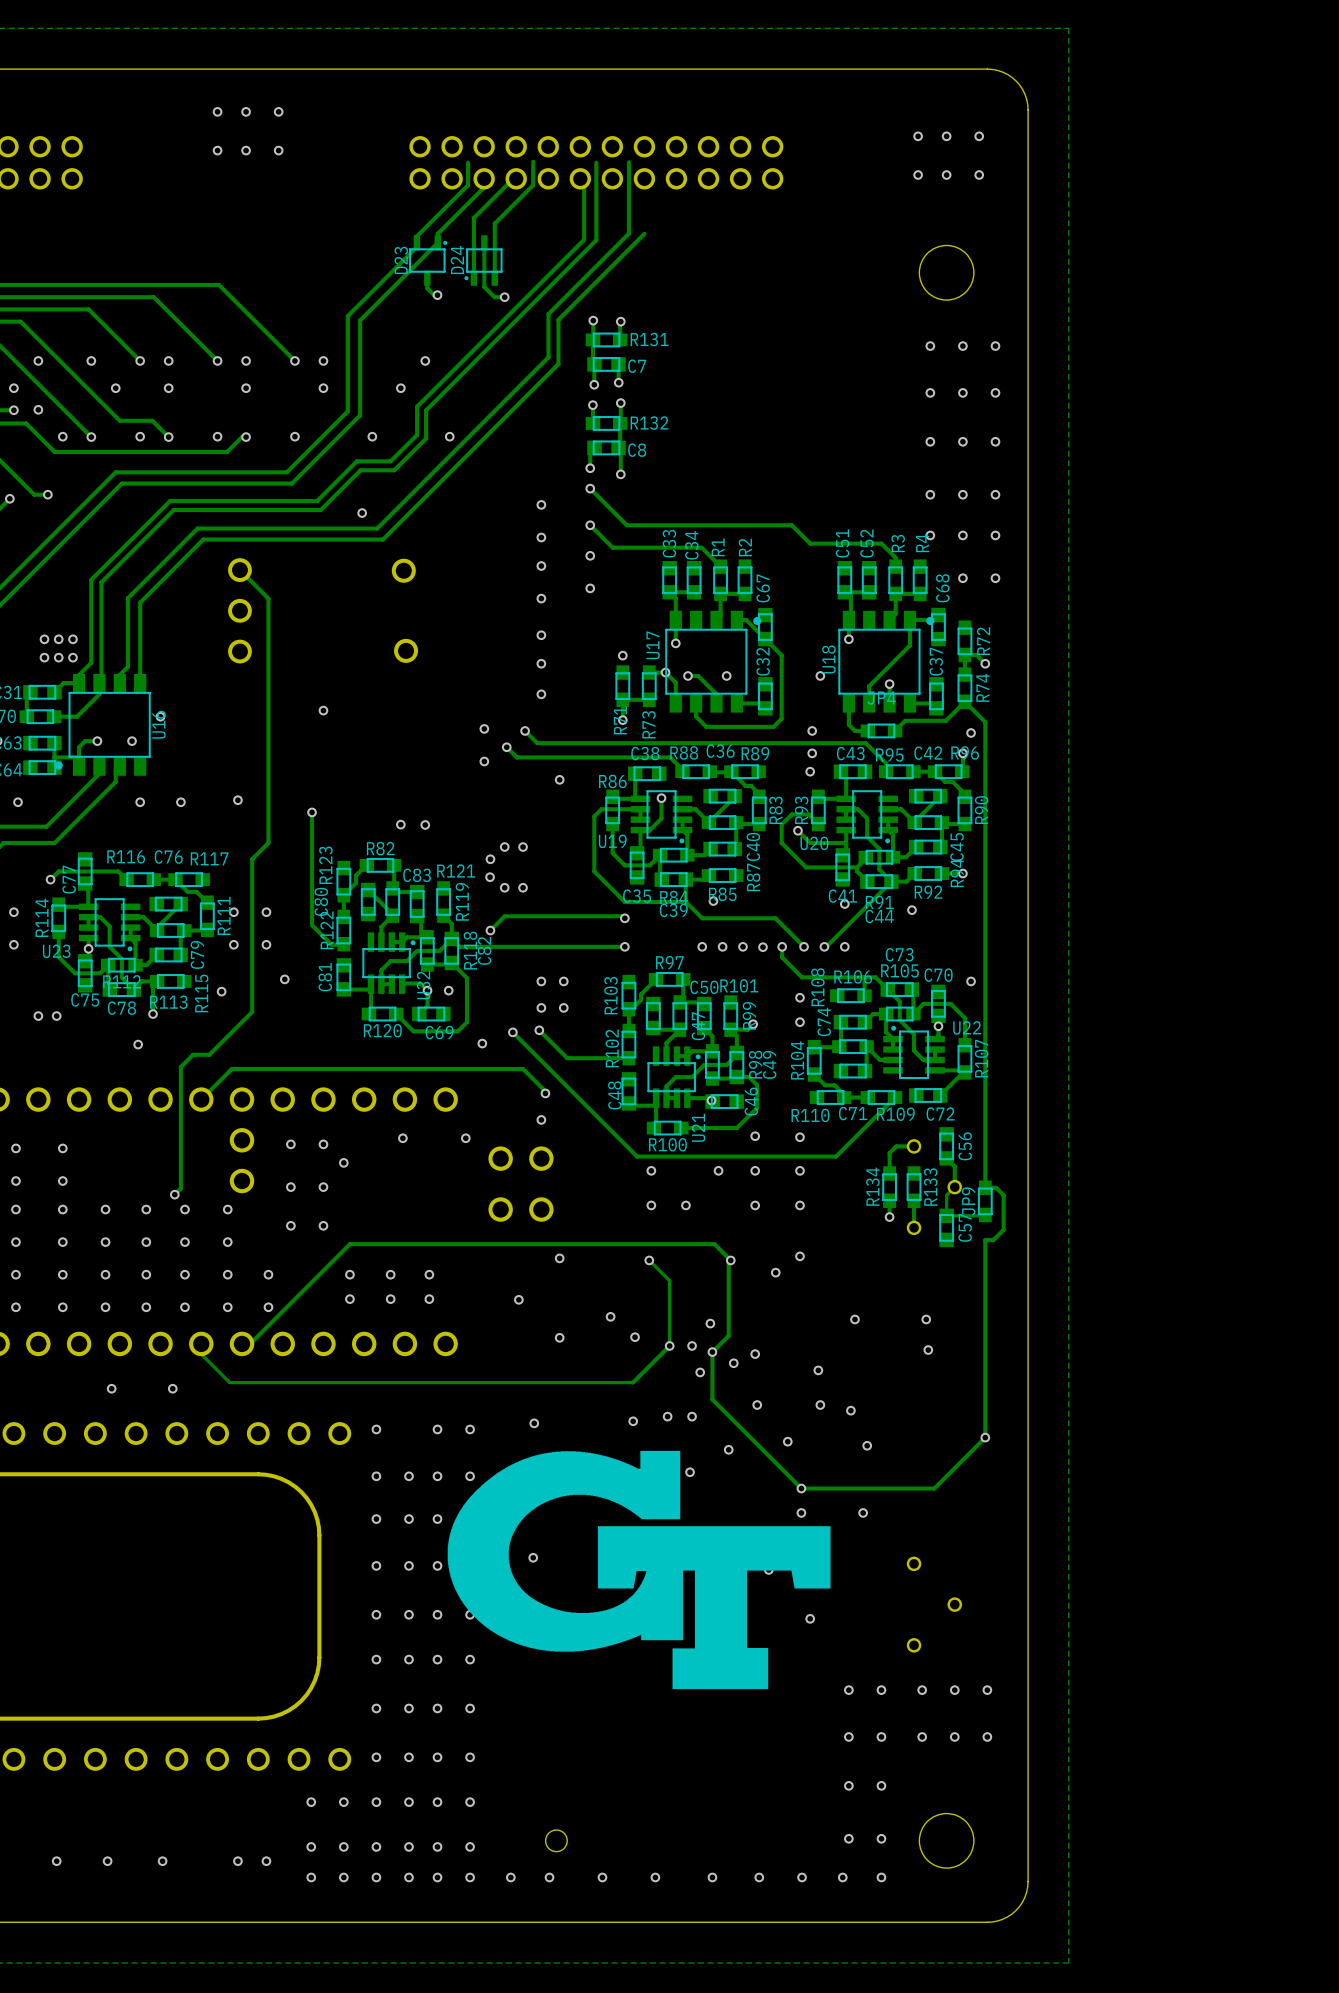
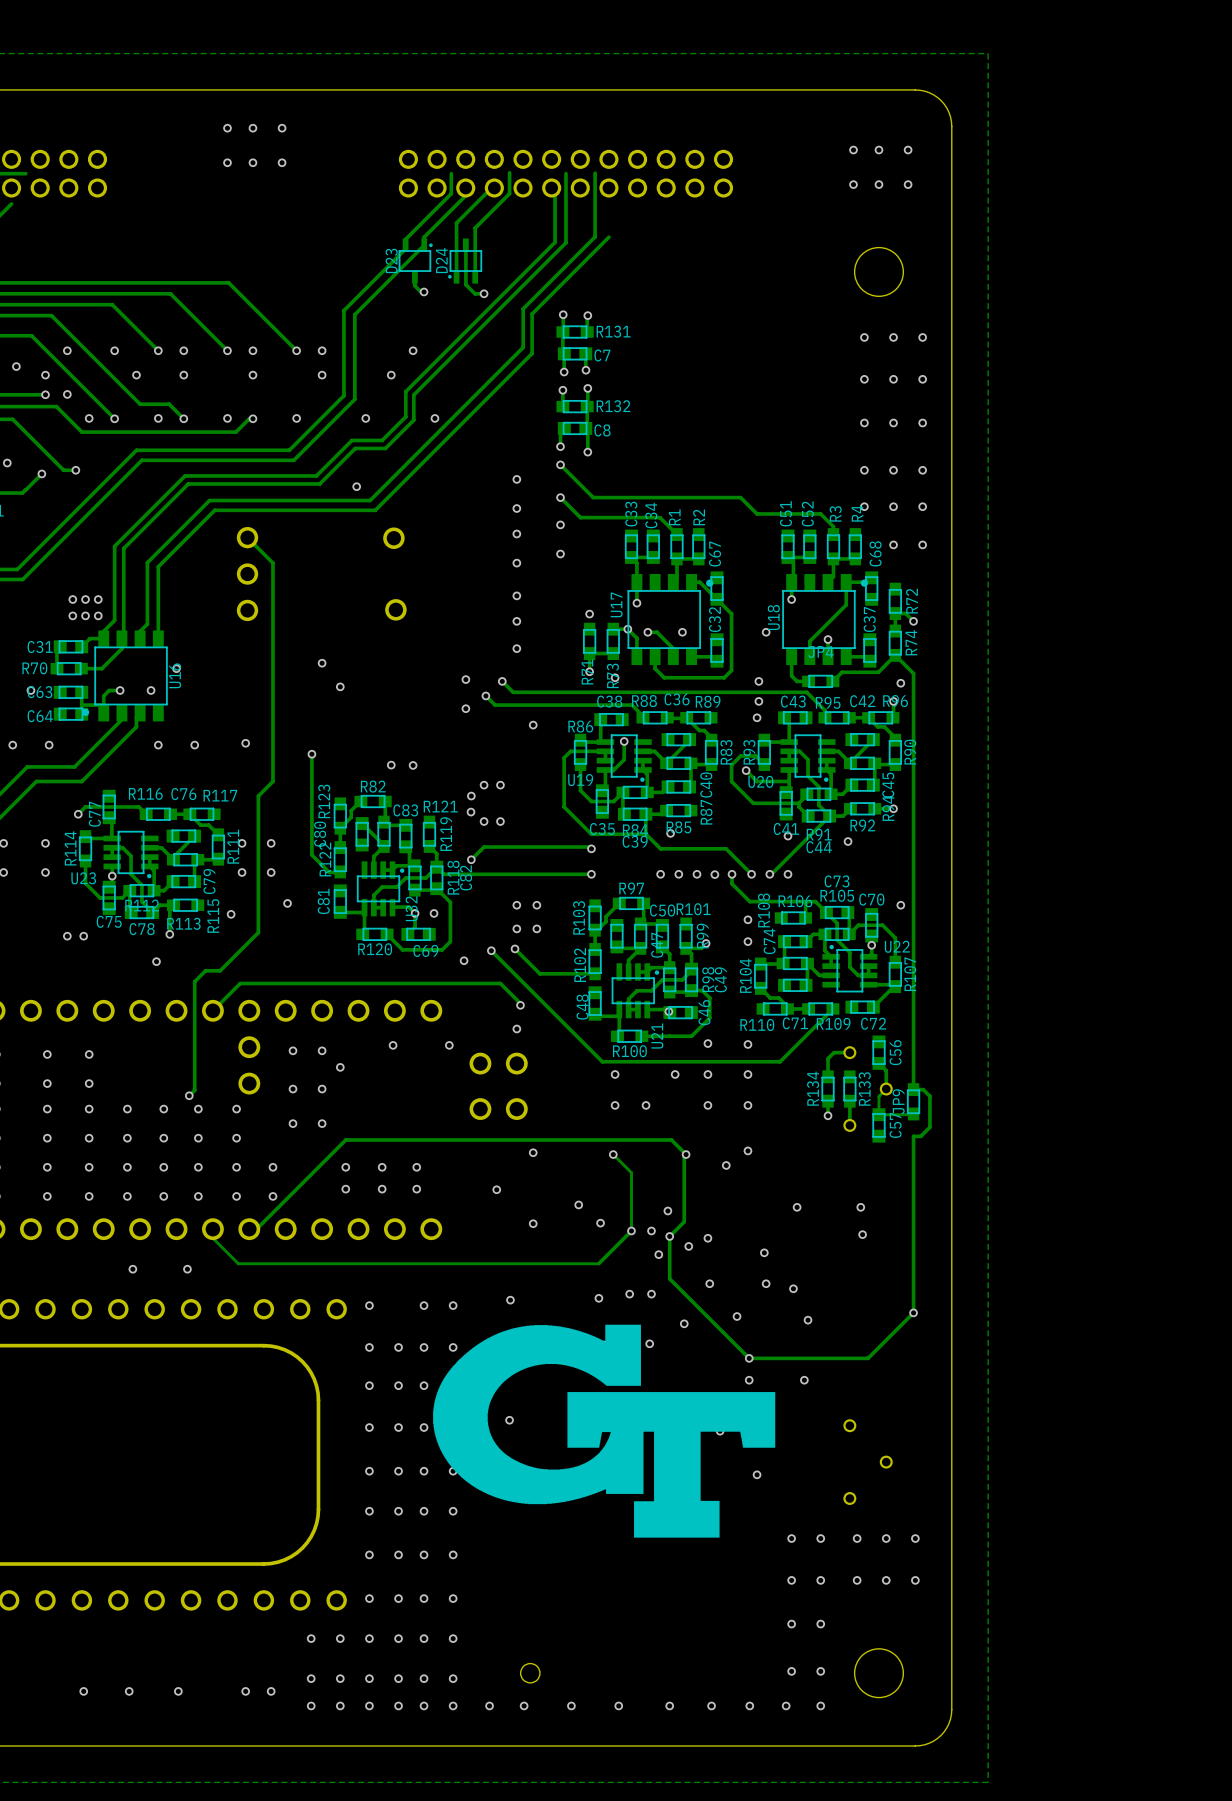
via: none -> (615, 677)
via: none -> (340, 686)

